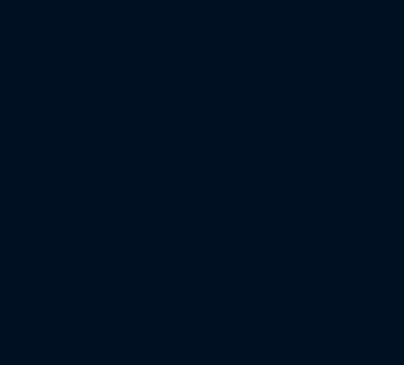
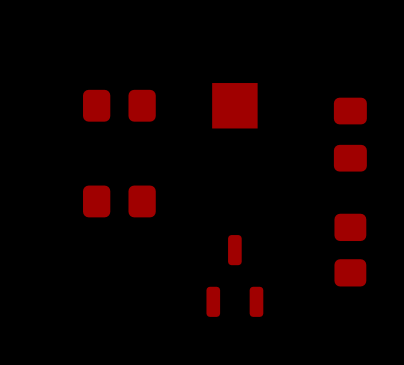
part: none -> (119, 105)
part: none -> (234, 105)
part: none -> (350, 134)
part: none -> (119, 201)
part: none -> (350, 250)
part: none -> (234, 275)

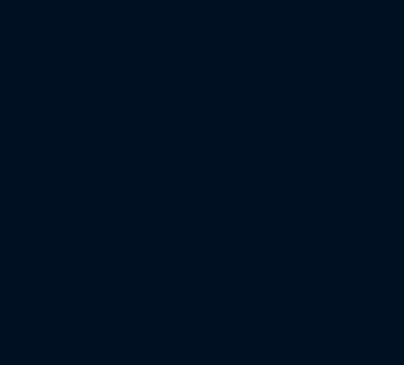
part: (119, 105) -> none
part: (234, 105) -> none
part: (350, 134) -> none
part: (119, 201) -> none
part: (350, 250) -> none
part: (234, 275) -> none

